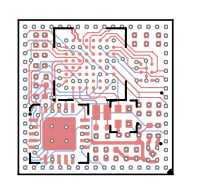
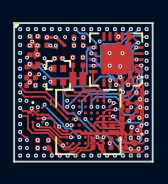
drawing: none -> [14, 23, 20, 29]
bottom track: (51, 26) (51, 31) (71, 51) (77, 51) (93, 67) -> none
top track: (69, 26) (75, 35) (73, 40) -> none
top track: (77, 26) (74, 31) (79, 40) -> none
bottom track: none -> (75, 29) (79, 33) (86, 33) (95, 42) (95, 47) (90, 47) (86, 51) (86, 73) (81, 78) (50, 78) (39, 66) (27, 66)
top track: (104, 26) (98, 32) (87, 32) (83, 37) (83, 43) (86, 47) -> none
top track: (113, 26) (101, 35) (92, 35) (90, 37) (90, 50) (93, 54) -> none
bottom track: none -> (130, 29) (122, 36)
bottom track: none -> (138, 29) (134, 33) (131, 33) (120, 43) (103, 43) (101, 46) (101, 63) (98, 65) (91, 65)
top track: none -> (128, 36) (132, 36) (138, 42)
top track: (25, 35) (30, 30) (48, 30) (54, 36) (54, 46) (59, 50) (69, 50) (73, 54) -> none
via: none -> (46, 37)
via: none -> (55, 37)
via: none -> (65, 37)
via: none -> (83, 37)
via: (146, 35) -> none
via: (158, 35) -> none
bottom track: none -> (146, 37) (132, 35) (126, 42) (126, 69) (116, 80) (112, 76) (100, 76) (90, 86) (70, 86) (63, 93) (63, 109) (67, 113) (73, 113) (97, 137)
top track: none -> (46, 37) (56, 37) (65, 45)
via: none -> (74, 38)
part: (158, 39) -> none
top track: none -> (32, 41) (36, 45) (34, 57)
via: none -> (32, 41)
part: none -> (46, 41)
via: (66, 40) -> none
part: none -> (73, 41)
part: none -> (83, 41)
top track: (100, 40) (106, 33) (116, 33) (134, 51) (152, 51) (157, 56) (157, 70) (165, 70) -> none
top track: (106, 40) (111, 36) (115, 36) (134, 55) (148, 55) (151, 58) (151, 64) -> none
bottom track: none -> (138, 42) (130, 48) (130, 77) (123, 84) (123, 91)
via: none -> (138, 42)
via: (134, 43) -> none
via: (146, 43) -> none
top track: (25, 44) (29, 40) (47, 40) (57, 54) (66, 54) -> none
bottom track: (58, 44) (54, 41) (34, 41) (31, 44) (31, 60) -> none
via: none -> (55, 45)
via: (158, 44) -> none
via: none -> (74, 45)
via: none -> (83, 45)
via: (73, 47) -> none
bottom track: (79, 47) (106, 73) (113, 73) (117, 78) (117, 96) (110, 103) (87, 103) (76, 114) (63, 114) (59, 110) (47, 122) (47, 153) (40, 160) (25, 158) -> none
via: (79, 47) -> none
via: (100, 47) -> none
top track: (114, 47) (121, 47) (132, 58) (143, 58) (145, 60) -> none
bottom track: none -> (136, 47) (132, 50) (132, 65) (139, 71) (136, 91) (128, 99) (118, 99) (115, 96) (95, 96) (91, 101) (91, 106)
via: none -> (136, 47)
top track: (25, 53) (28, 50) (48, 50) (55, 57) (76, 57) (79, 60) -> none
via: none -> (91, 53)
via: none -> (109, 53)
via: none -> (122, 53)
top track: (79, 54) (83, 57) (81, 64) (57, 64) (54, 66) (55, 101) (52, 105) (52, 110) -> none
top track: (106, 54) (110, 50) (119, 50) (127, 58) (127, 65) (134, 72) (147, 72) (151, 76) (162, 76) (165, 79) -> none
top track: (113, 54) (117, 54) (122, 58) -> none
via: (35, 55) -> none
via: none -> (27, 57)
via: none -> (72, 57)
via: none -> (82, 57)
via: (122, 58) -> none
via: none -> (44, 58)
via: none -> (54, 58)
part: none -> (58, 58)
via: none -> (62, 58)
top track: (30, 60) (29, 65) (29, 103) (32, 106) -> none
via: (30, 60) -> none
top track: (66, 60) (54, 61) (52, 64) (51, 97) -> none
via: (113, 60) -> none
via: (145, 60) -> none
via: none -> (136, 59)
part: none -> (72, 61)
part: none -> (82, 61)
top track: (136, 62) (141, 64) -> none
via: (136, 62) -> none
part rotation: 0° (89, 64) -> 180° (88, 121)
part position: (89, 64) -> (88, 121)
top track: (44, 65) (39, 70) (31, 72) (31, 100) (32, 102) -> (20, 92) (27, 96)
via: (44, 65) -> none
via: none -> (44, 66)
top track: (79, 67) (76, 70) (59, 70) -> none
top track: none -> (72, 65) (72, 90) (75, 92) (88, 92) (91, 95) (91, 100)
via: (93, 67) -> none
top track: none -> (82, 65) (82, 88) (94, 89) (97, 92) (97, 100)
top track: (113, 67) (138, 92) (154, 92) -> (140, 53) (132, 54) (131, 83) (136, 87)
via: none -> (109, 65)
bottom track: none -> (141, 65) (140, 83)
via: none -> (141, 65)
part: none -> (31, 66)
top track: (136, 68) (146, 68) -> (37, 118) (46, 118)
bottom track: (25, 70) (36, 70) (40, 67) (41, 61) (60, 61) (79, 81) -> none
top track: (73, 74) (69, 77) (59, 78) -> none
bottom track: (100, 74) (97, 76) (97, 87) (89, 95) (56, 95) (54, 93) (48, 93) (40, 100) (40, 113) (37, 115) -> none
via: (100, 74) -> none
top track: (113, 74) (136, 97) (160, 97) (165, 103) (165, 106) -> none
bottom track: (59, 78) (55, 78) (49, 72) (40, 72) (31, 84) (31, 90) (25, 97) -> none
via: (59, 78) -> none
part: (151, 78) -> none
bottom track: none -> (135, 76) (133, 78) (133, 88) (126, 96) (120, 96) (118, 93) (89, 93) (81, 101) (81, 111) (79, 112)
via: none -> (44, 77)
via: (146, 80) -> none
part: (46, 81) -> none
top track: (66, 81) (62, 85) (58, 85) -> none
via: (73, 81) -> none
via: (79, 81) -> none
bottom track: (86, 81) (86, 87) (81, 92) (59, 92) (56, 89) (44, 89) (35, 97) (33, 120) (40, 127) (40, 143) (36, 147) -> none
via: (86, 81) -> none
via: (106, 81) -> none
bottom track: (113, 81) (96, 98) (68, 98) (65, 101) (65, 110) -> none
via: (113, 81) -> none
bottom track: none -> (110, 80) (110, 88) (107, 91) (82, 91) (67, 106)
via: none -> (110, 80)
top track: none -> (122, 80) (122, 85) (119, 88) (119, 119) (117, 122) (96, 122) (94, 128) (97, 131)
part: none -> (26, 81)
top track: (34, 85) (45, 85) (44, 96) -> none
part: none -> (35, 81)
bottom track: (58, 85) (54, 85) (46, 77) (41, 81) (41, 86) (28, 98) (28, 102) (25, 106) -> none
via: (66, 87) -> none
top track: (79, 87) (79, 97) (82, 100) (96, 102) (96, 127) -> none
top track: (86, 87) (86, 93) (90, 97) (104, 97) (107, 99) (107, 127) -> none
top track: (93, 87) (94, 93) (114, 93) -> (93, 71) (93, 81) (100, 88)
via: (113, 87) -> none
top track: none -> (140, 83) (143, 86) (143, 121) (141, 125)
top track: none -> (20, 84) (25, 92) (46, 92) (67, 112)
via: none -> (116, 84)
via: none -> (128, 84)
via: none -> (35, 85)
via: none -> (44, 85)
top track: (158, 92) (161, 92) (165, 97) -> (139, 87) (141, 114) (134, 115) (129, 120)
part: (40, 96) -> none
top track: none -> (123, 91) (122, 122) (119, 124) (109, 125)
via: none -> (123, 91)
via: (36, 97) -> none
bottom track: (51, 97) (51, 106) (42, 114) (42, 146) (34, 152) -> none
via: (51, 97) -> none
top track: none -> (129, 92) (128, 102) (138, 102)
via: none -> (136, 92)
bottom track: none -> (146, 92) (140, 98) (140, 104) (132, 114) (125, 114) (119, 109) (115, 109)
part: none -> (132, 93)
top track: (77, 100) (84, 108) (84, 120) -> (66, 95) (84, 95) (85, 100)
top track: (36, 102) (41, 107) (40, 139) (31, 140) -> (30, 96) (44, 96) (67, 118)
via: (138, 104) -> none
via: (148, 104) -> none
via: (45, 105) -> none
via: (59, 105) -> none
bottom track: (32, 106) (31, 127) -> none
via: none -> (67, 100)
via: none -> (109, 100)
top track: none -> (116, 103) (109, 106)
part: (149, 109) -> none
bottom track: (52, 110) (45, 118) (45, 149) (37, 157) (32, 157) (25, 150) -> none
via: (65, 110) -> none
part position: (101, 112) -> (77, 78)
via: none -> (37, 107)
via: none -> (67, 106)
via: none -> (73, 106)
via: none -> (91, 106)
via: none -> (97, 106)
via: none -> (103, 106)
via: (138, 113) -> none
part: none -> (127, 106)
part: none -> (136, 106)
top track: none -> (20, 108) (23, 111) (33, 111) (37, 114) (48, 114) (54, 121) (54, 126) (61, 134) (70, 134) (73, 131)
bottom track: none -> (46, 107) (65, 128) (70, 128) (79, 137)
part rotation: 0° (124, 116) -> 180° (57, 75)
part position: (124, 116) -> (57, 75)
top track: none -> (115, 109) (106, 109) (103, 112)
via: none -> (115, 109)
part: none -> (37, 112)
via: none -> (79, 112)
top track: none -> (20, 116) (27, 116) (27, 128) (32, 133) (48, 133) (64, 149) (73, 149) (79, 143)
top track: none -> (116, 115) (100, 115) (97, 118)
bottom track: (158, 125) (144, 125) (132, 112) (97, 112) (91, 118) (91, 143) (87, 147) (81, 147) (81, 152) (92, 162) (99, 162) (104, 167) -> none
bottom track: none -> (46, 118) (51, 118) (59, 126)
via: (66, 126) -> none
bottom track: none -> (85, 118) (99, 133) (104, 133) (122, 151) (122, 155)
via: none -> (85, 118)
via: (138, 126) -> none
via: (31, 127) -> none
bottom track: (86, 127) (78, 127) (75, 129) (75, 148) (73, 151) (54, 151) (42, 163) (38, 163) (33, 167) -> none
via: none -> (129, 120)
top track: none -> (32, 122) (32, 127) (35, 130) (48, 130) (65, 147) (69, 147) (73, 143)
part: (96, 131) -> none
part: (107, 131) -> none
via: none -> (46, 123)
via: (36, 133) -> none
top track: none -> (38, 125) (40, 127) (50, 127) (60, 137) (66, 136)
via: none -> (38, 125)
part rotation: 0° (58, 133) -> 180° (116, 59)
part position: (58, 133) -> (116, 59)
via: none -> (67, 125)
top track: none -> (97, 125) (100, 128) (119, 128) (125, 134) (143, 134) (146, 131)
via: (118, 134) -> none
via: (127, 134) -> none
bottom track: none -> (141, 125) (141, 139) (138, 142) (119, 142) (116, 139)
via: none -> (141, 125)
top track: none -> (59, 126) (63, 131) (67, 131)
via: none -> (59, 126)
via: (138, 135) -> none
via: (158, 135) -> none
via: (96, 136) -> none
via: (107, 136) -> none
via: none -> (137, 130)
via: (51, 140) -> none
via: (66, 140) -> none
via: (86, 140) -> none
top track: none -> (85, 131) (88, 134) (88, 145) (86, 147) (78, 147) (67, 155)
top track: none -> (103, 131) (106, 134) (116, 134) (119, 137) (119, 146) (125, 152) (142, 152) (146, 147)
top track: none -> (109, 131) (117, 131) (126, 143) (142, 143) (146, 139)
via: (36, 147) -> none
via: none -> (79, 137)
top track: none -> (91, 137) (94, 140) (94, 146) (90, 150) (80, 150) (75, 155)
via: none -> (97, 137)
via: none -> (103, 137)
via: (95, 149) -> none
via: (105, 149) -> none
top track: (116, 149) (125, 158) (136, 158) -> none
via: (126, 149) -> none
via: none -> (26, 140)
via: none -> (37, 140)
via: none -> (48, 140)
top track: (34, 152) (41, 159) (45, 159) -> none
via: (34, 152) -> none
top track: none -> (97, 143) (101, 151) (99, 155)
top track: none -> (103, 143) (101, 147) (107, 155)
via: none -> (109, 143)
via: (152, 153) -> none
part: none -> (37, 144)
part: none -> (48, 144)
part: (95, 154) -> none
via: (105, 156) -> none
via: (95, 158) -> none
via: (116, 158) -> none
via: (126, 158) -> none
via: (136, 158) -> none
via: none -> (26, 148)
via: none -> (37, 148)
bottom track: (52, 159) (42, 167) -> none
drawing: [166, 168, 173, 175] -> none

